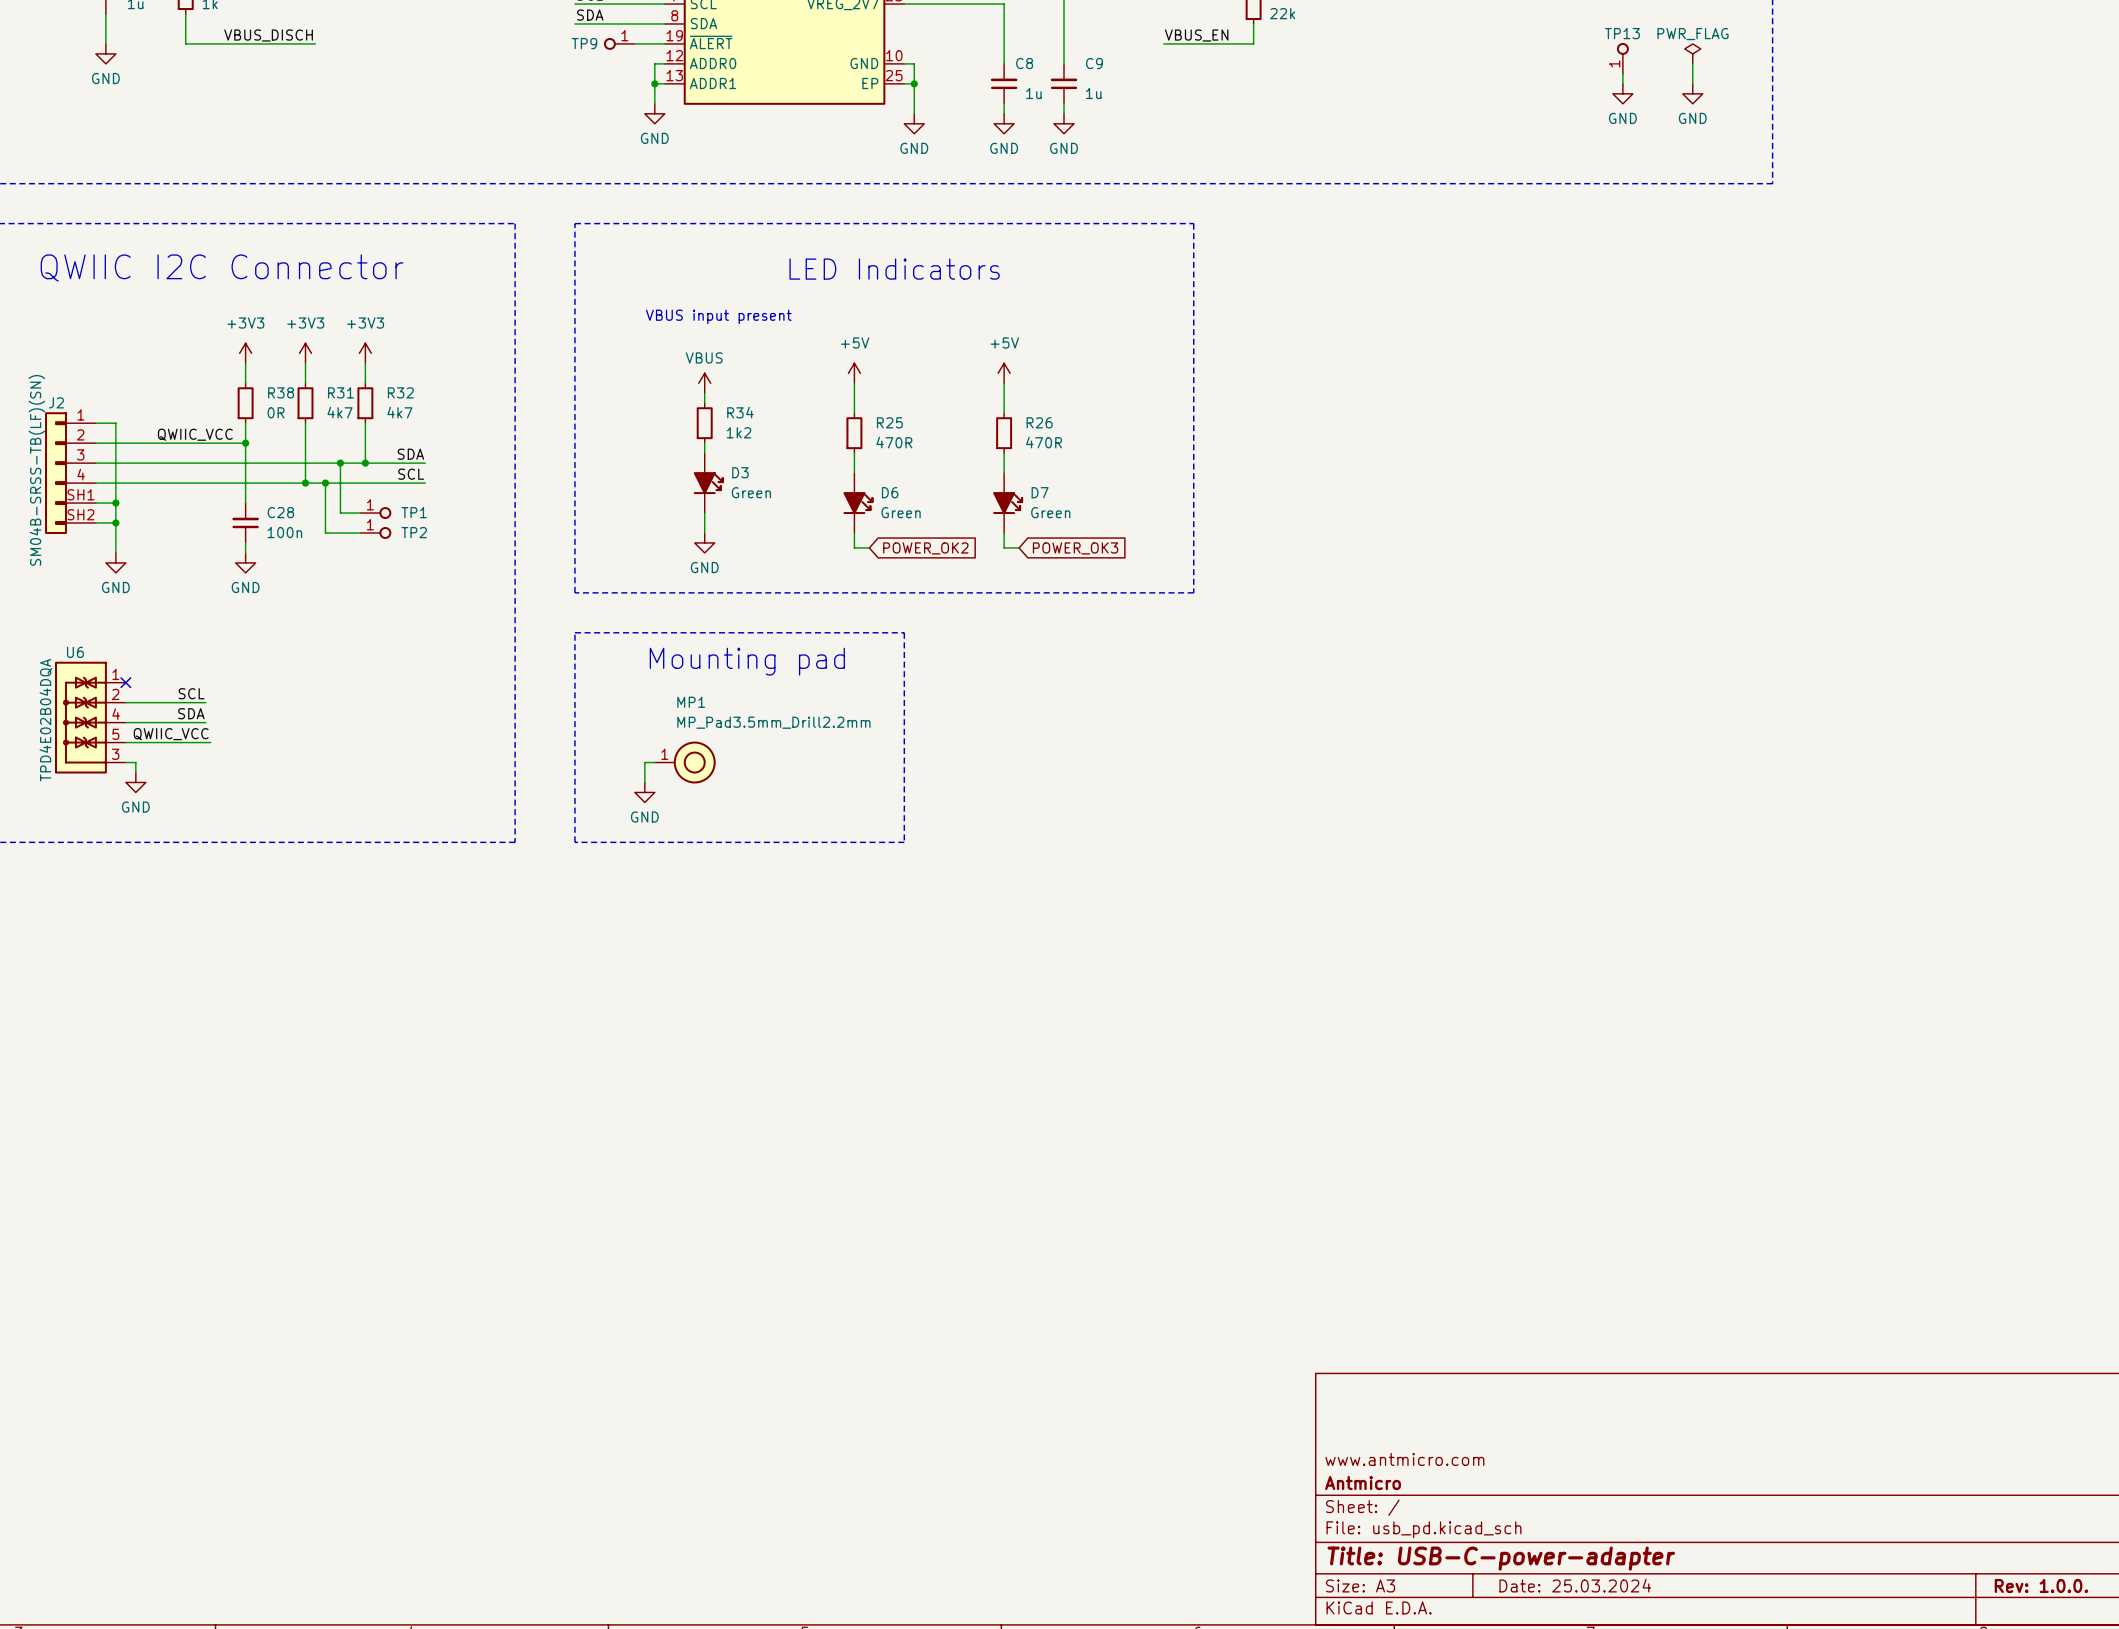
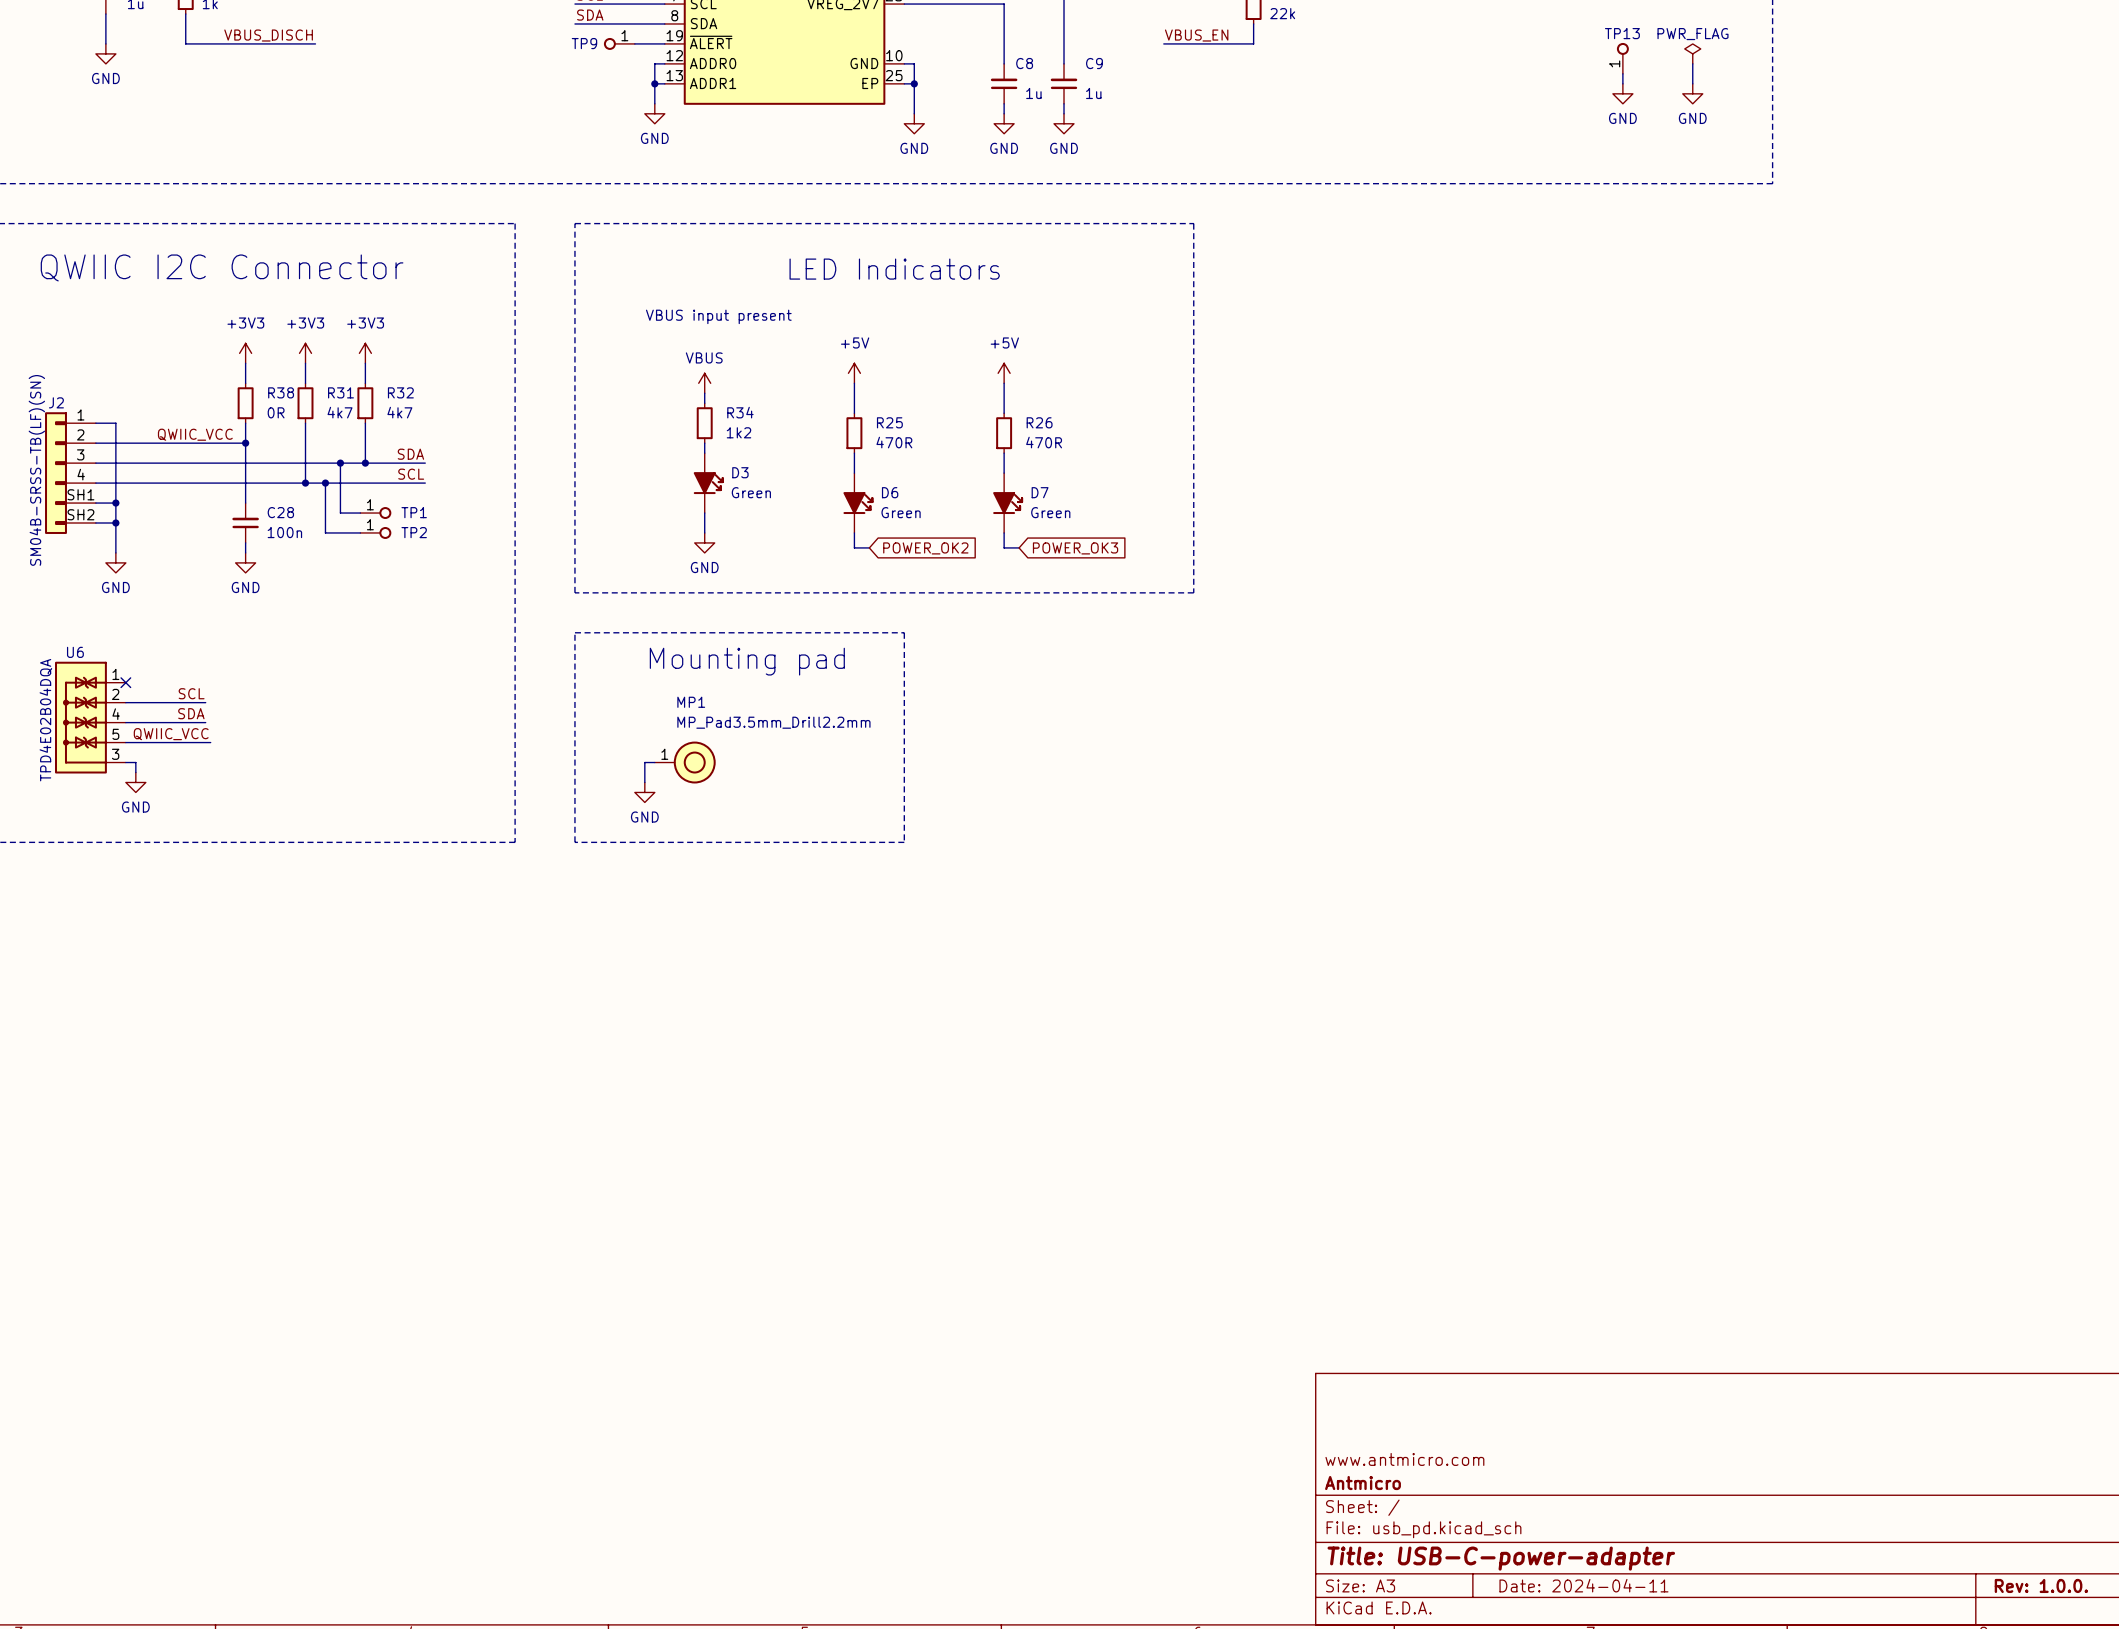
title block: Date: 25.03.2024 (1575, 1585) -> Date: 2024-04-11 (1583, 1585)

